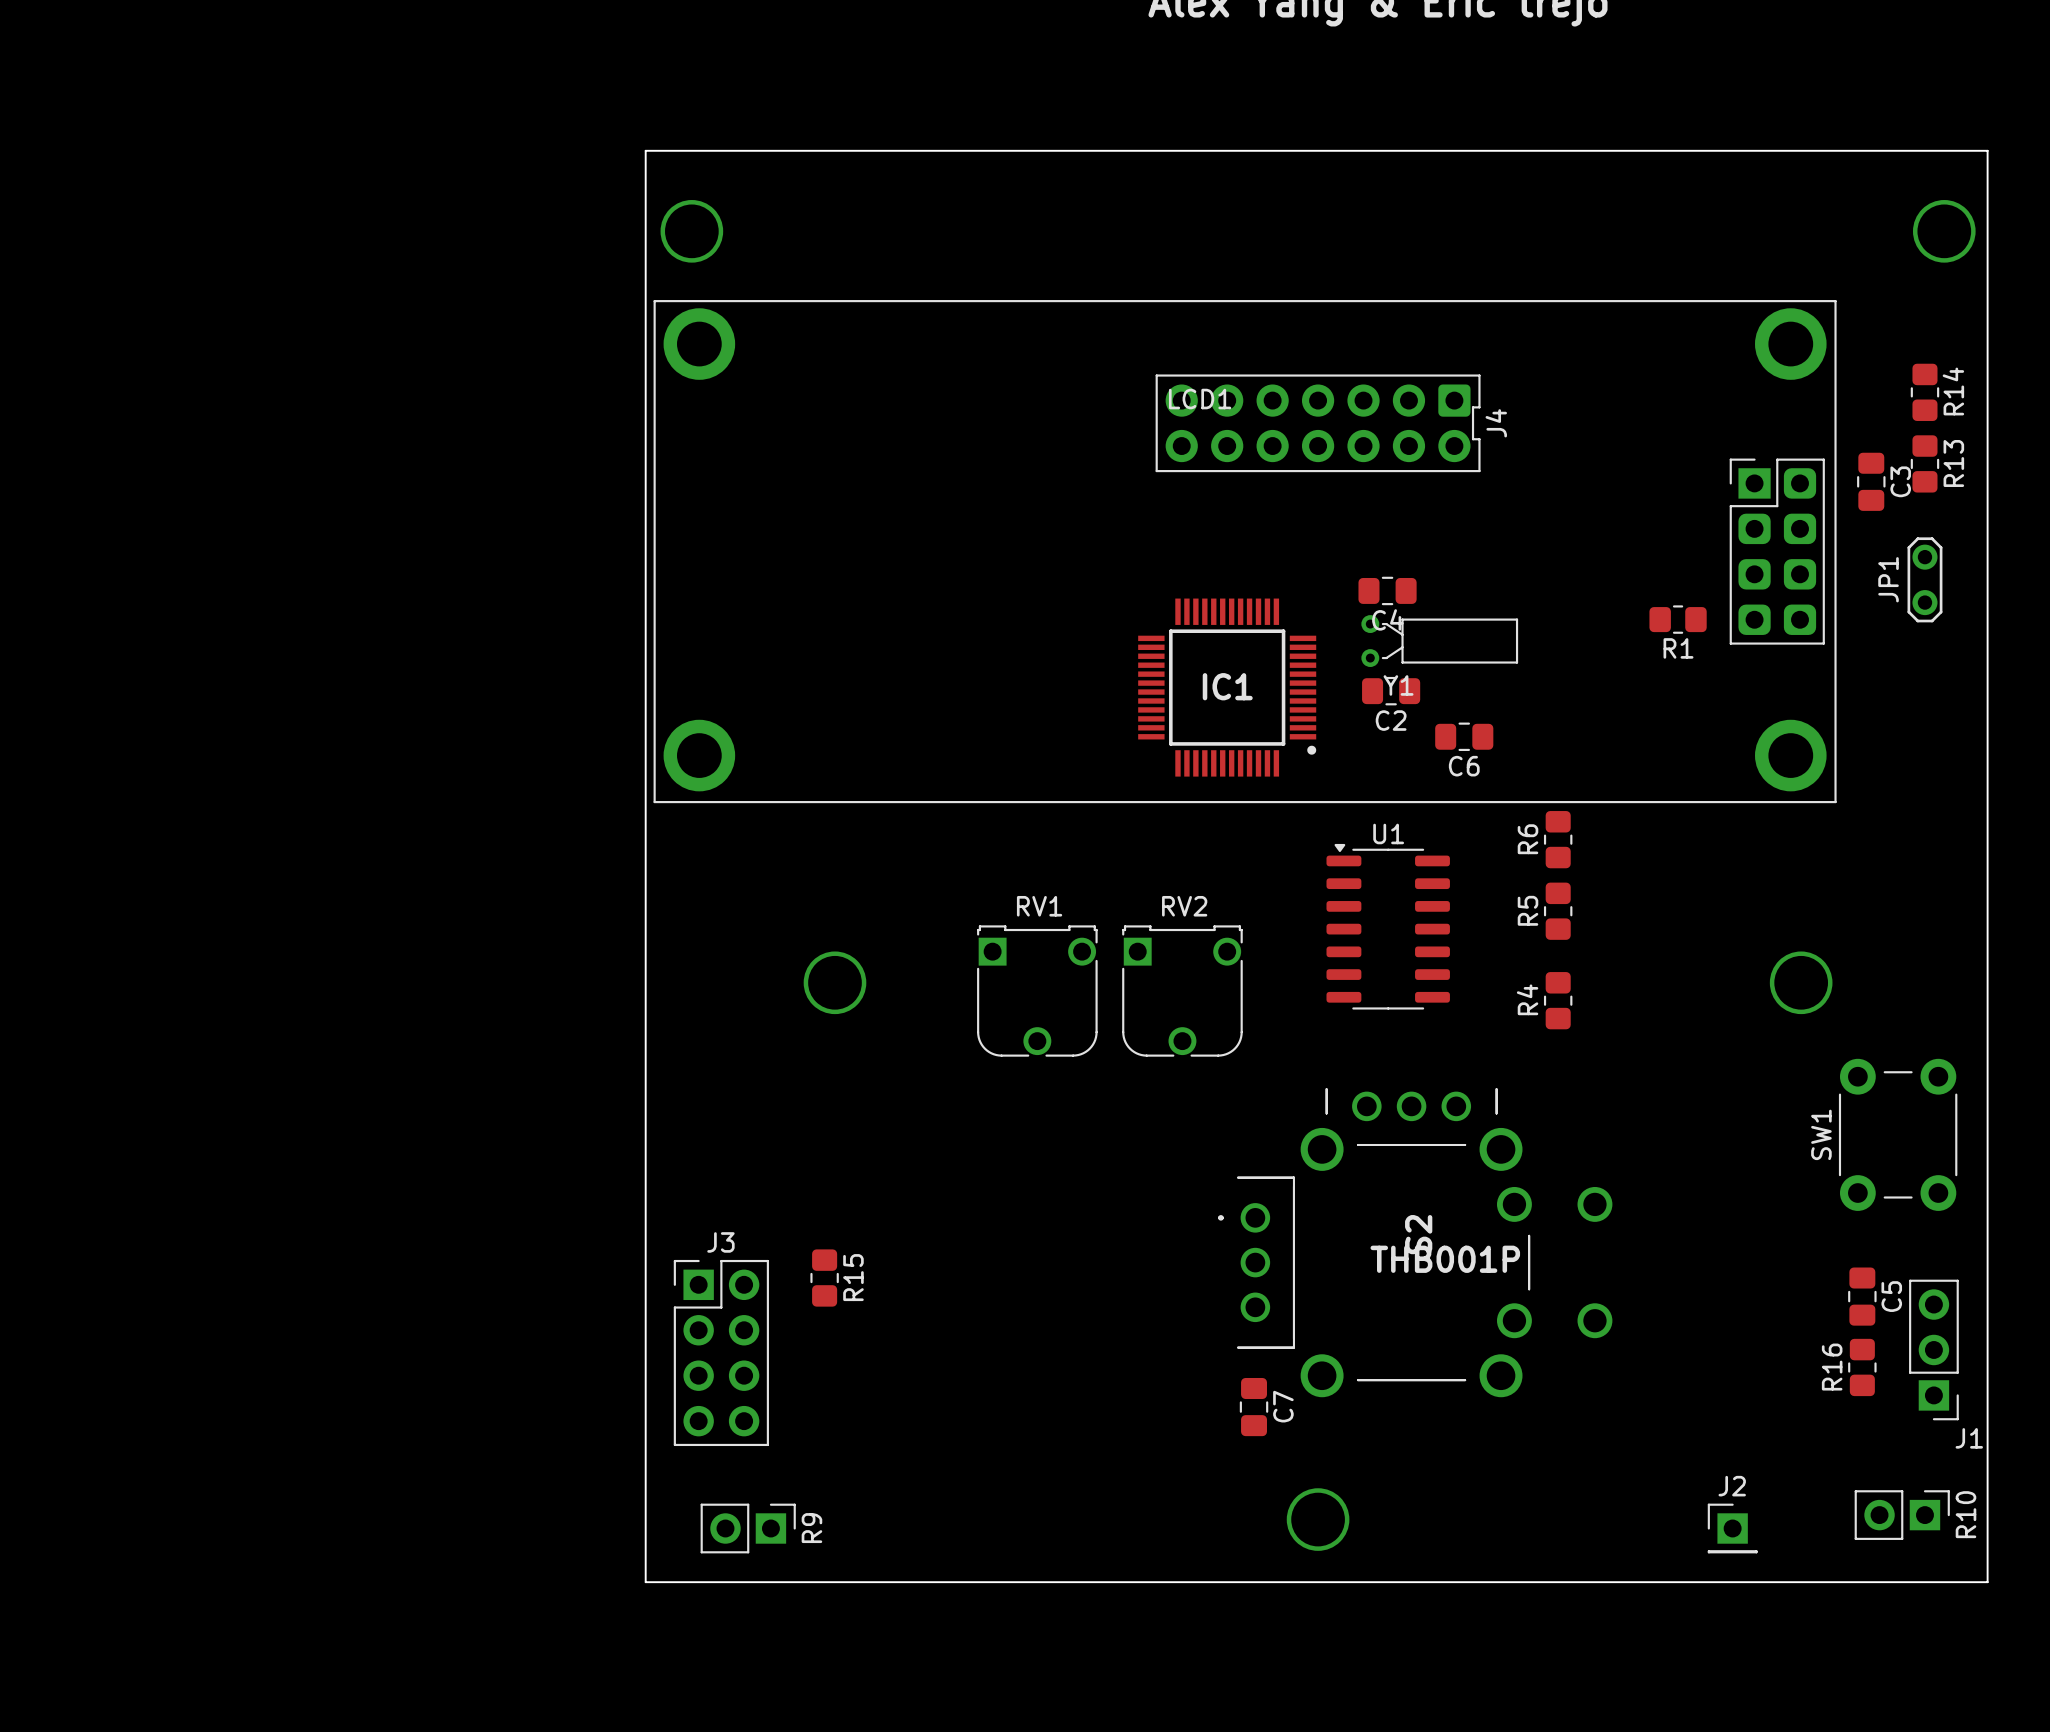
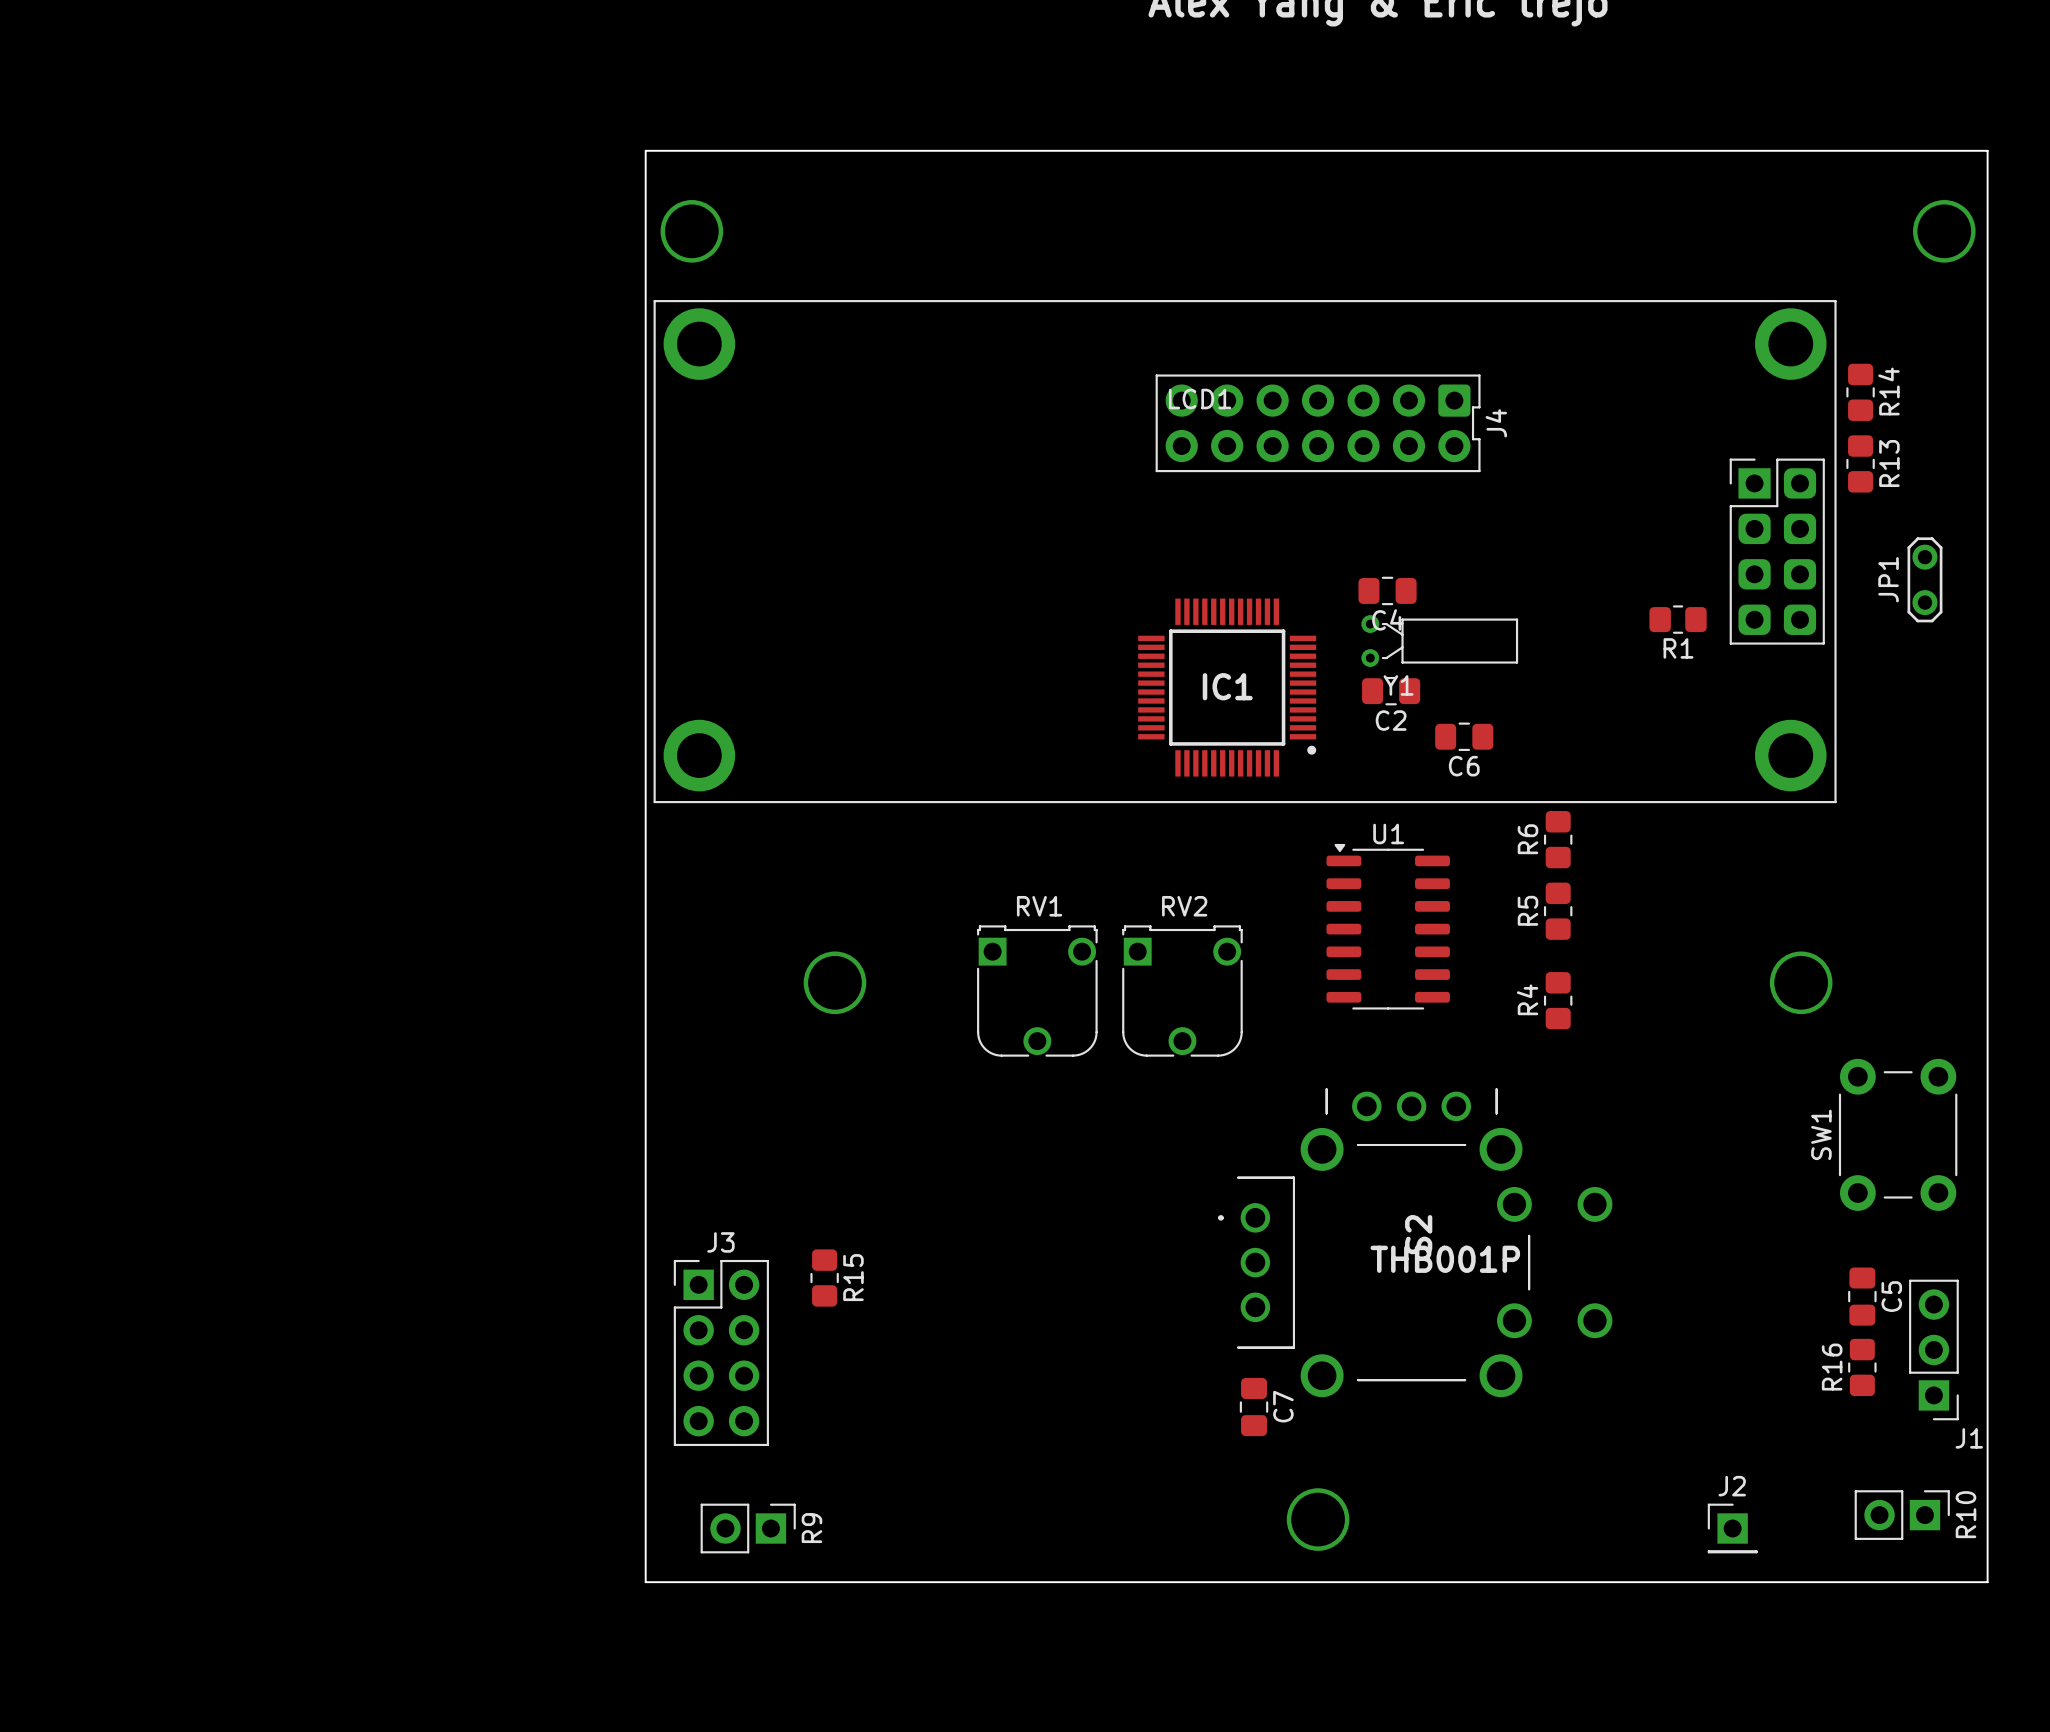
R14 position: (1924, 392) -> (1860, 392)
R13 position: (1924, 463) -> (1860, 463)
C3: (1871, 481) -> none

